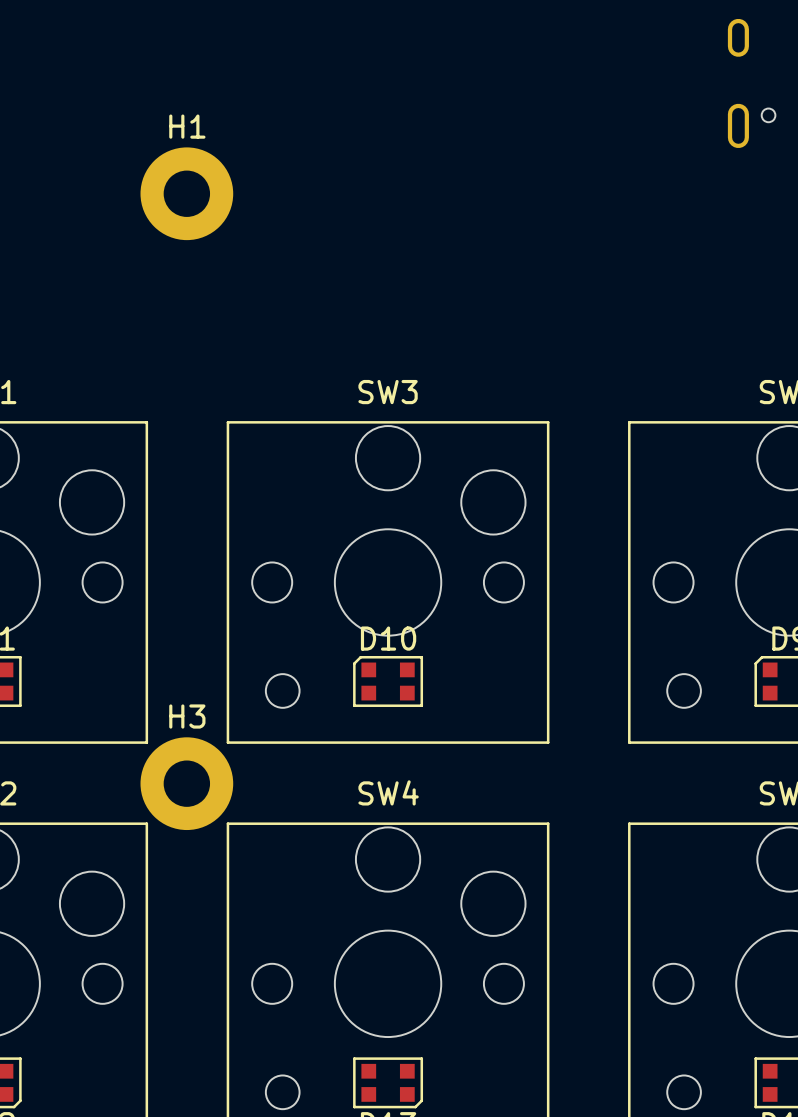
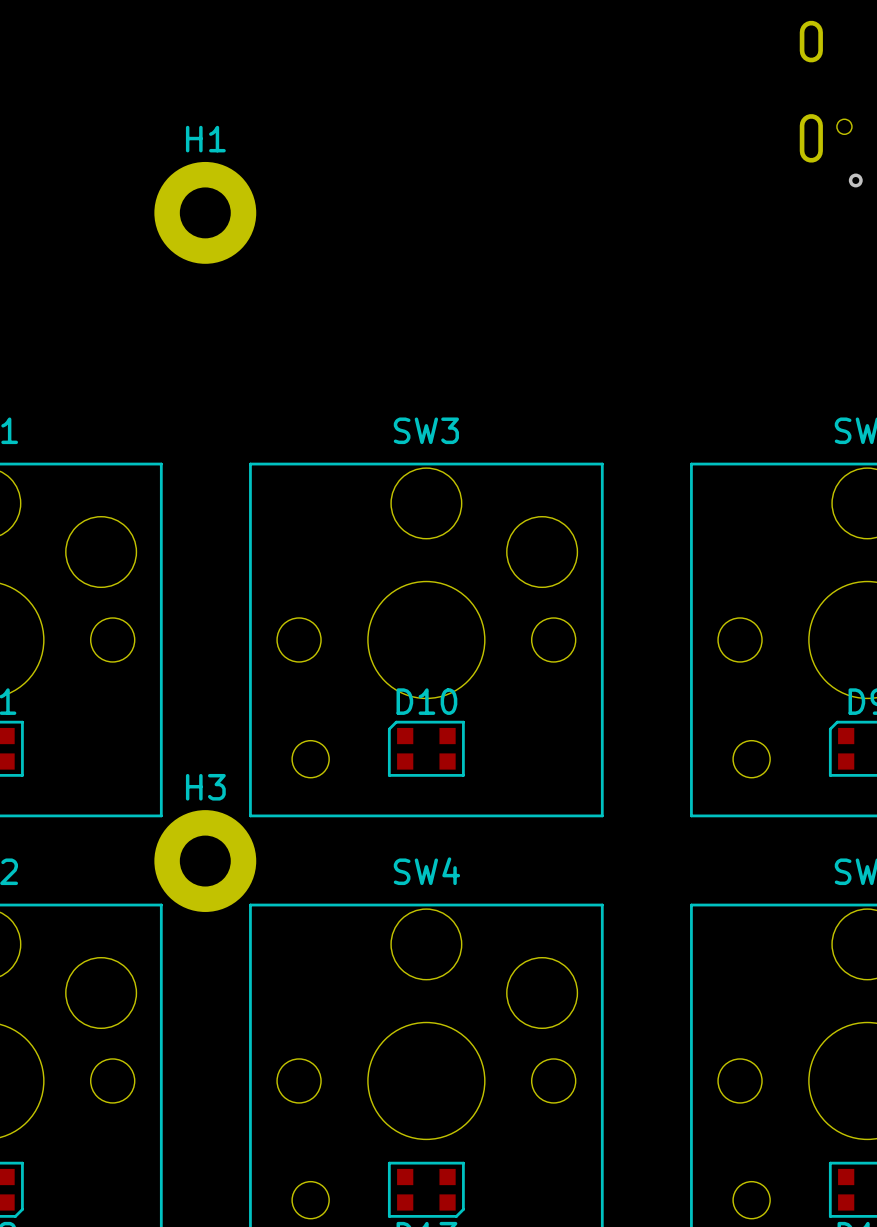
via: none -> (855, 180)

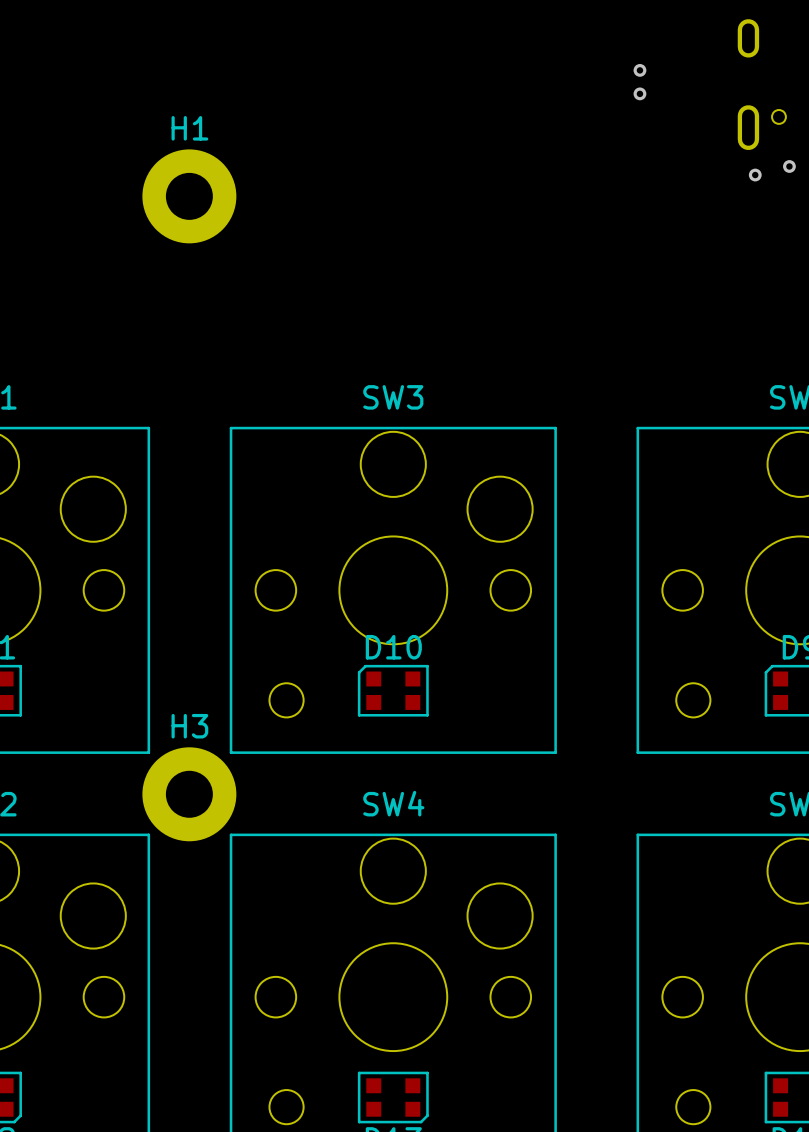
via: none -> (639, 70)
via: none -> (639, 93)
via: none -> (755, 175)

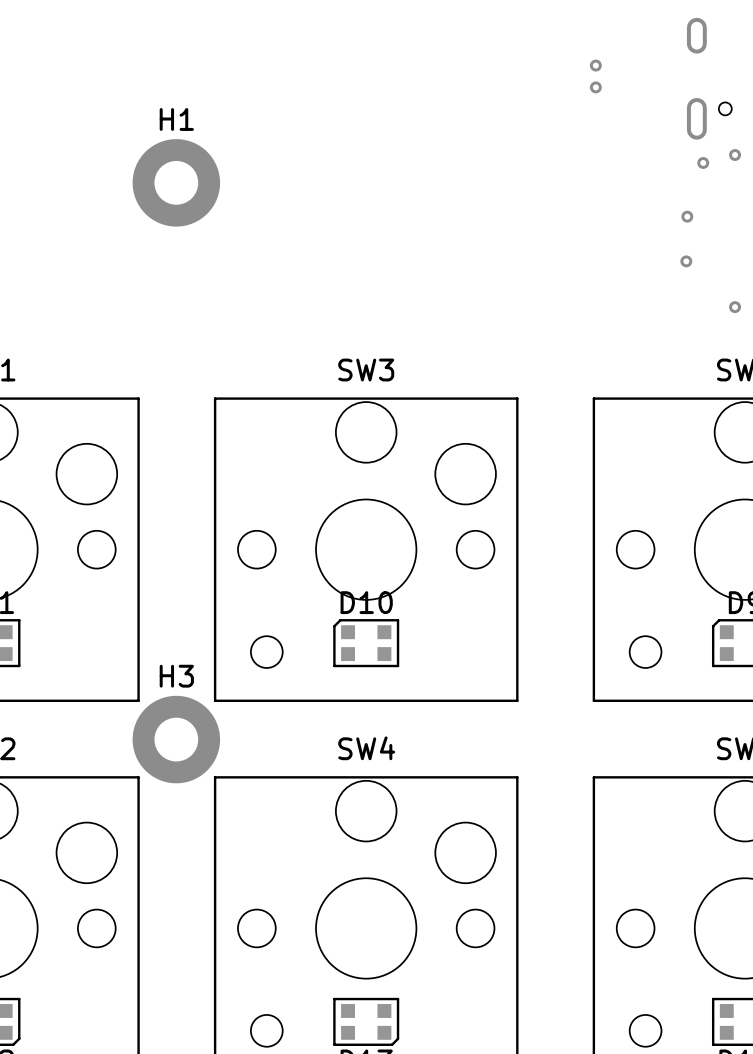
via: none -> (687, 216)
via: none -> (686, 261)
via: none -> (735, 307)

